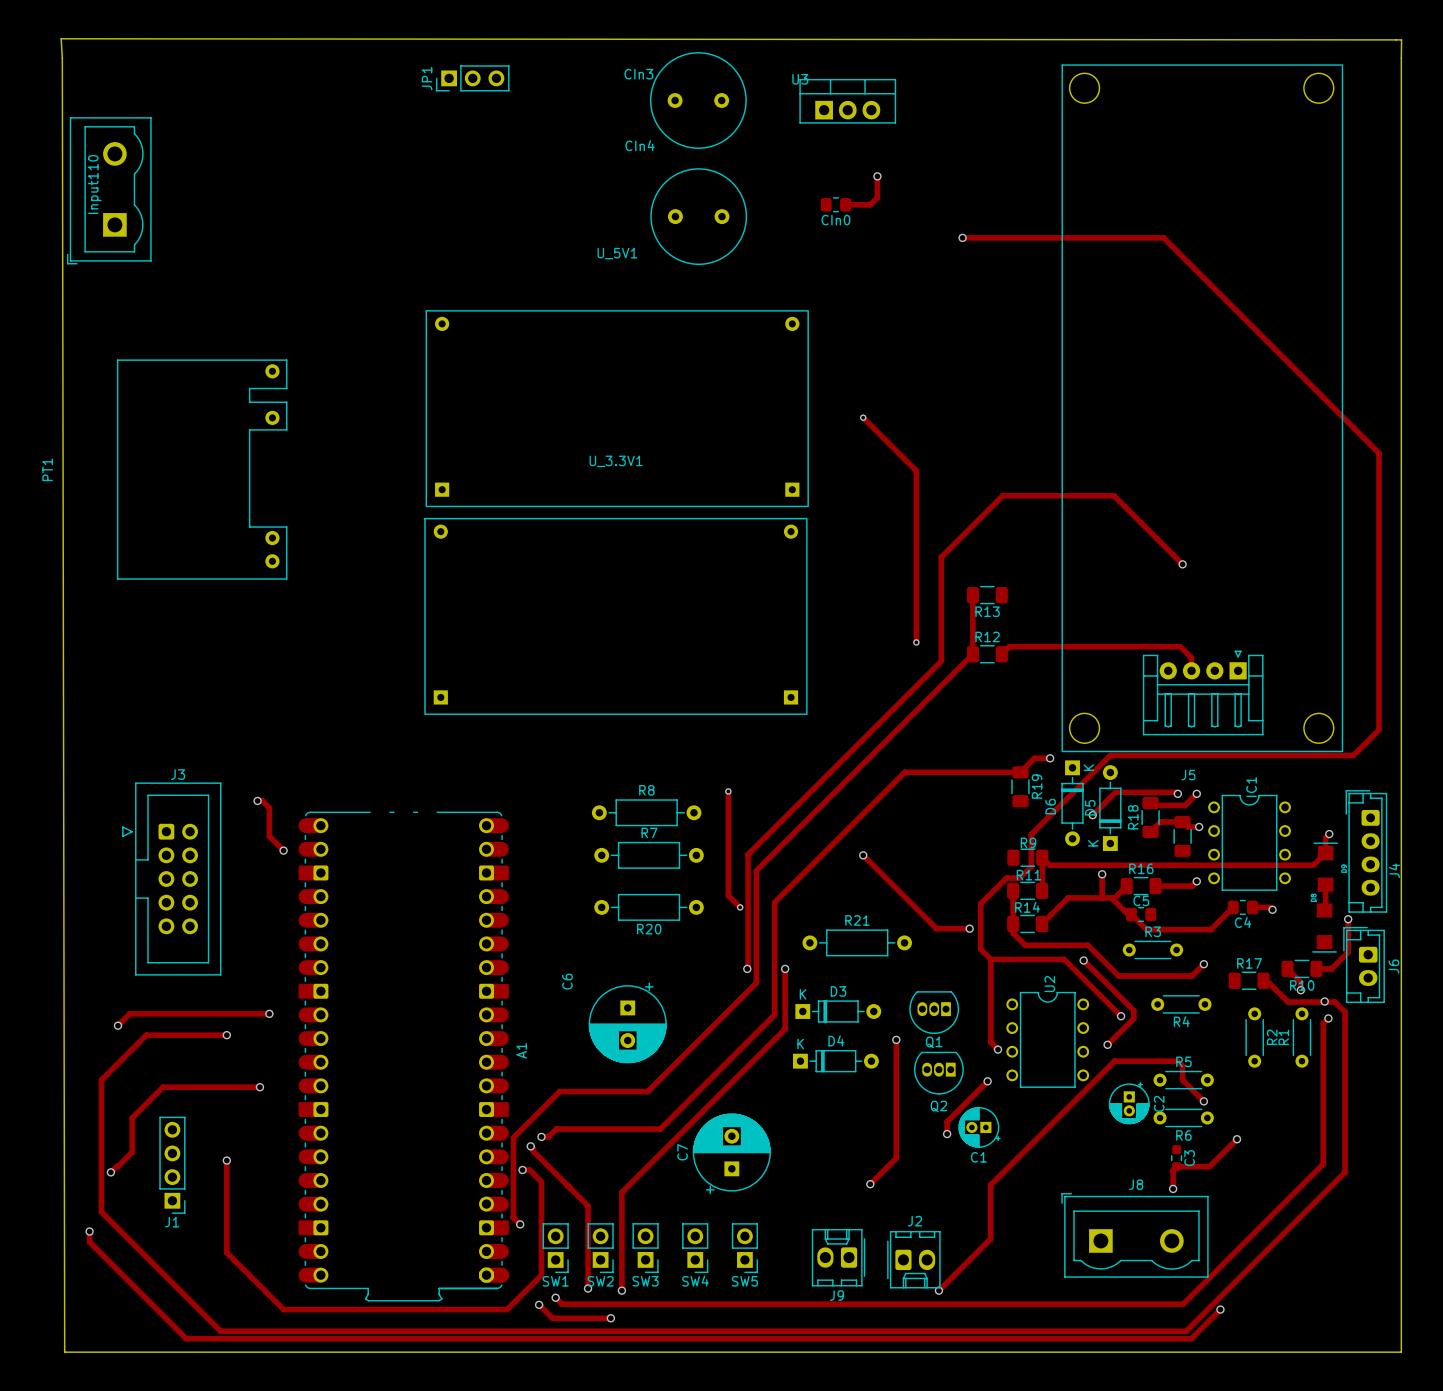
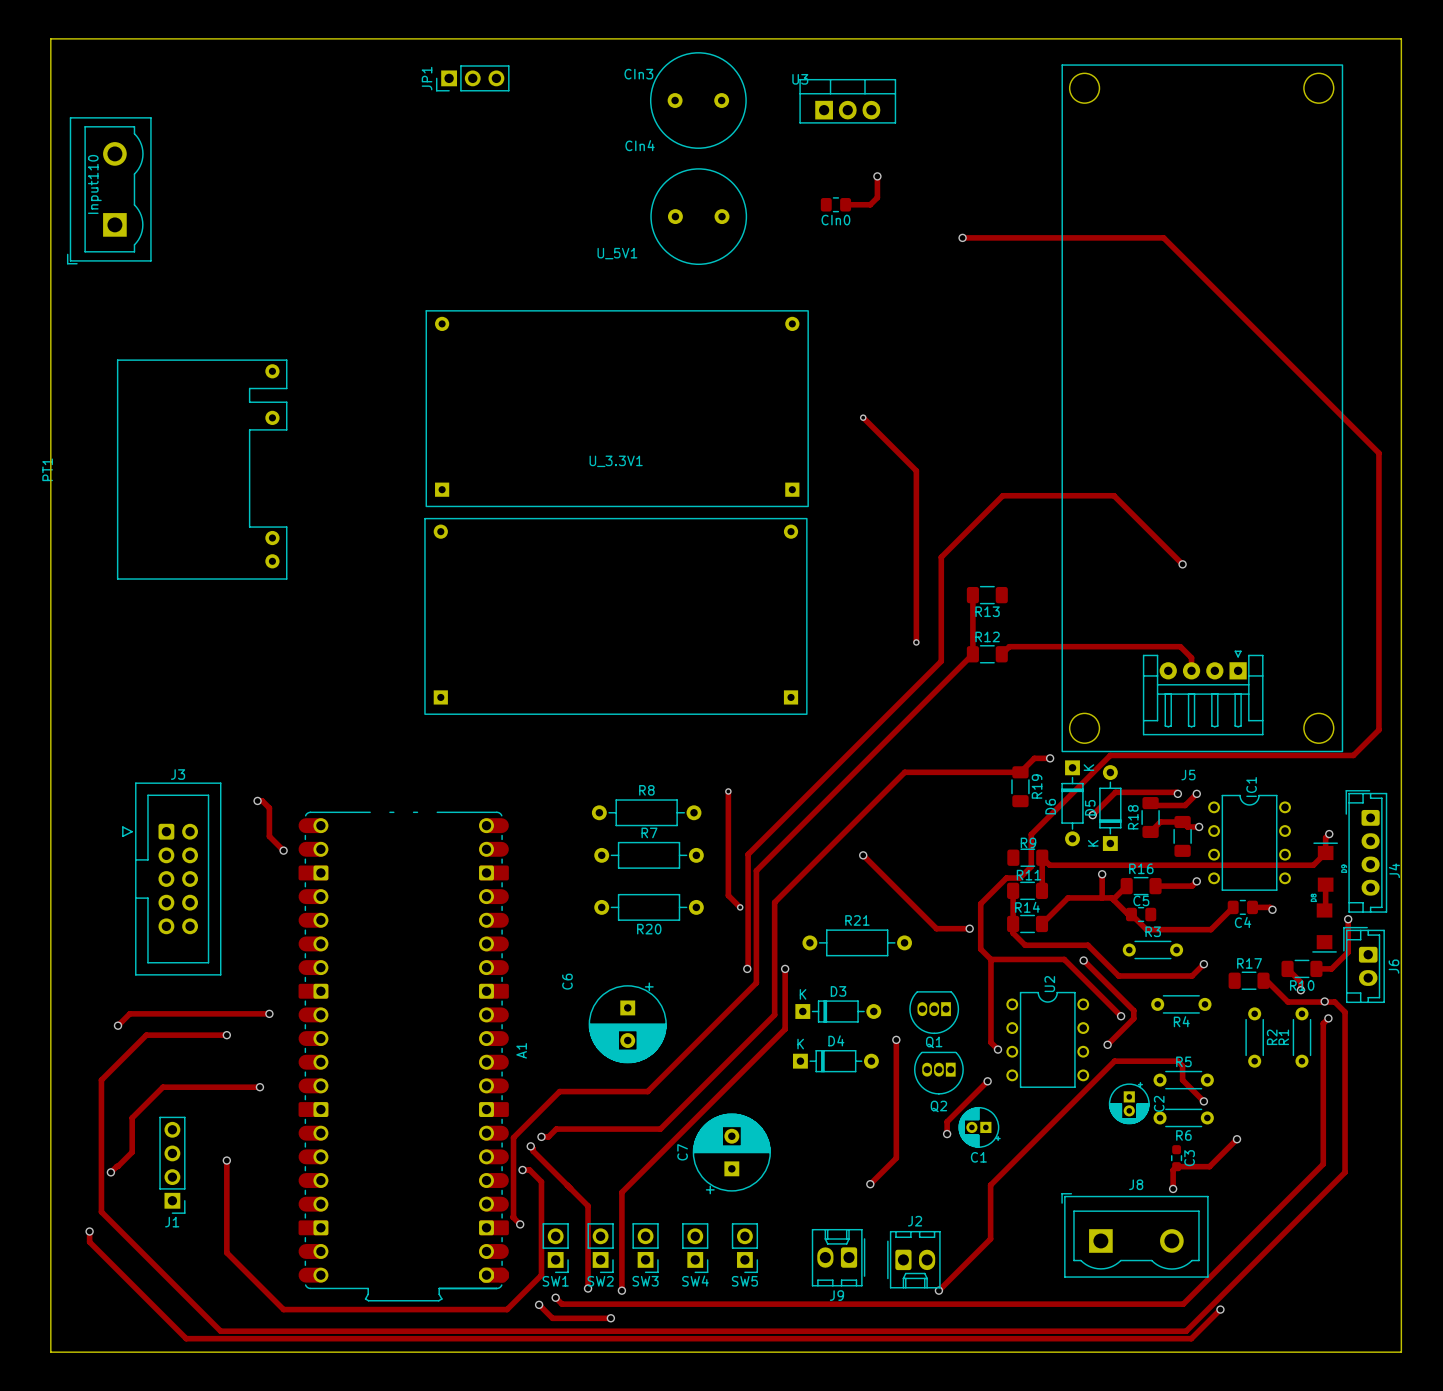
board edge: (1401, 58) (1401, 39) (61, 38) (64, 1352) -> (1401, 58) (1401, 38) (50, 38) (50, 1352) (64, 1352)

